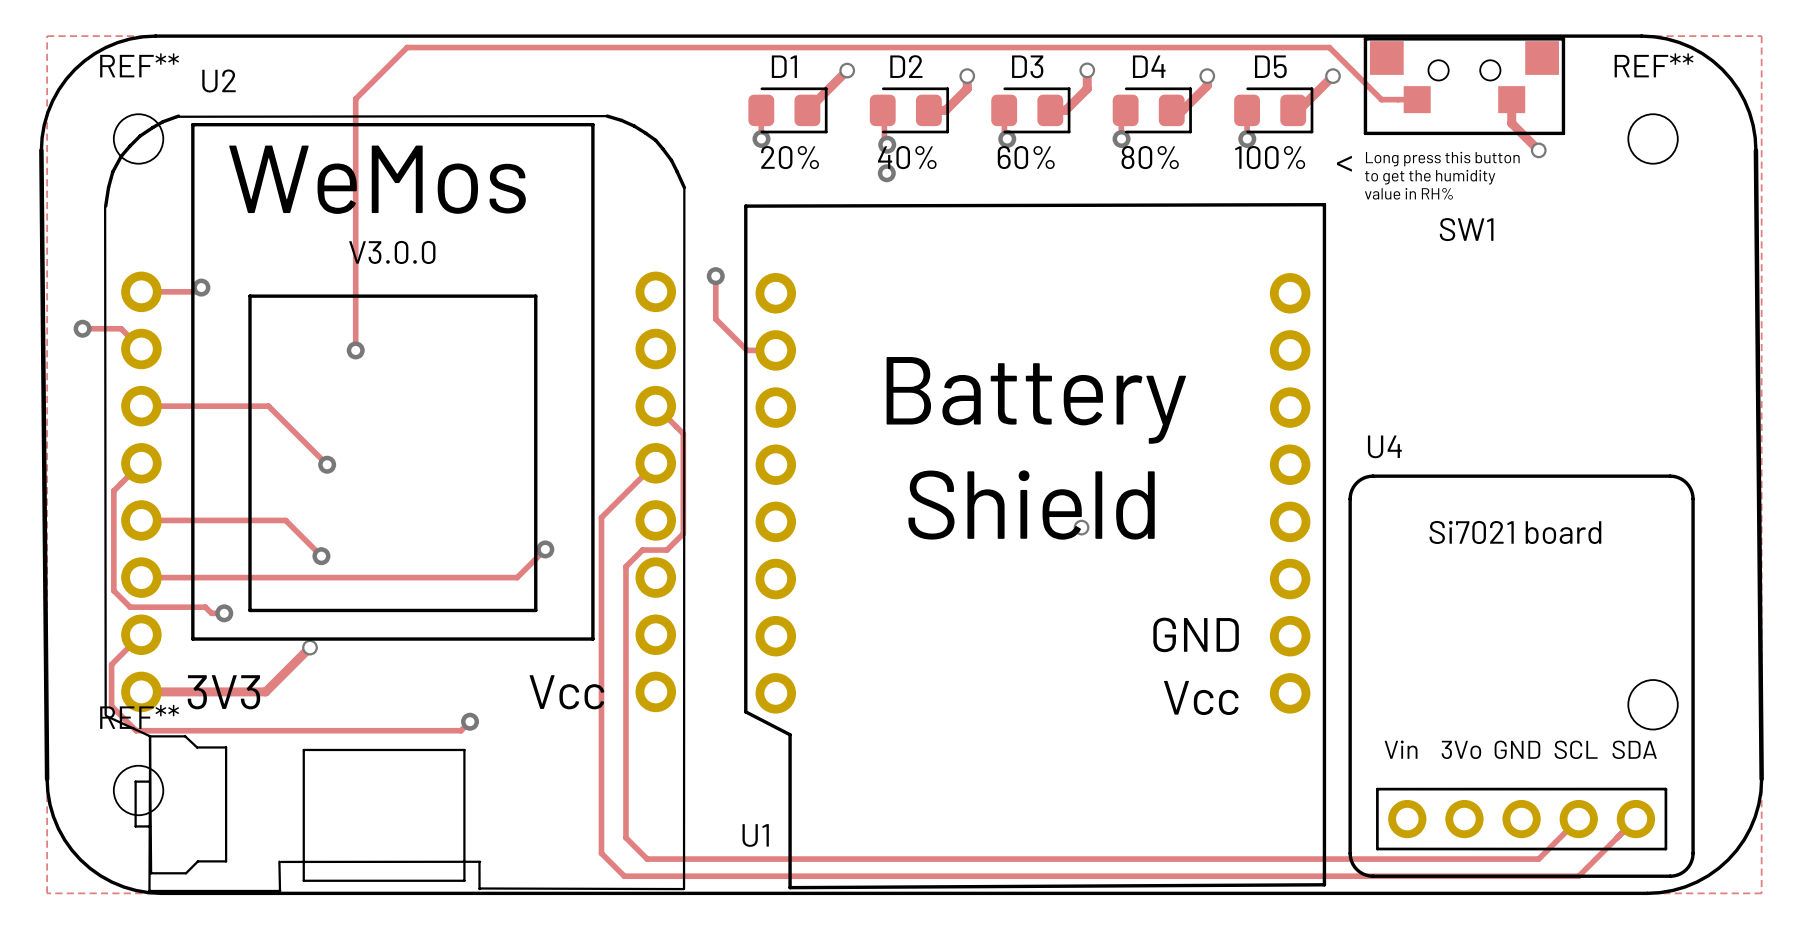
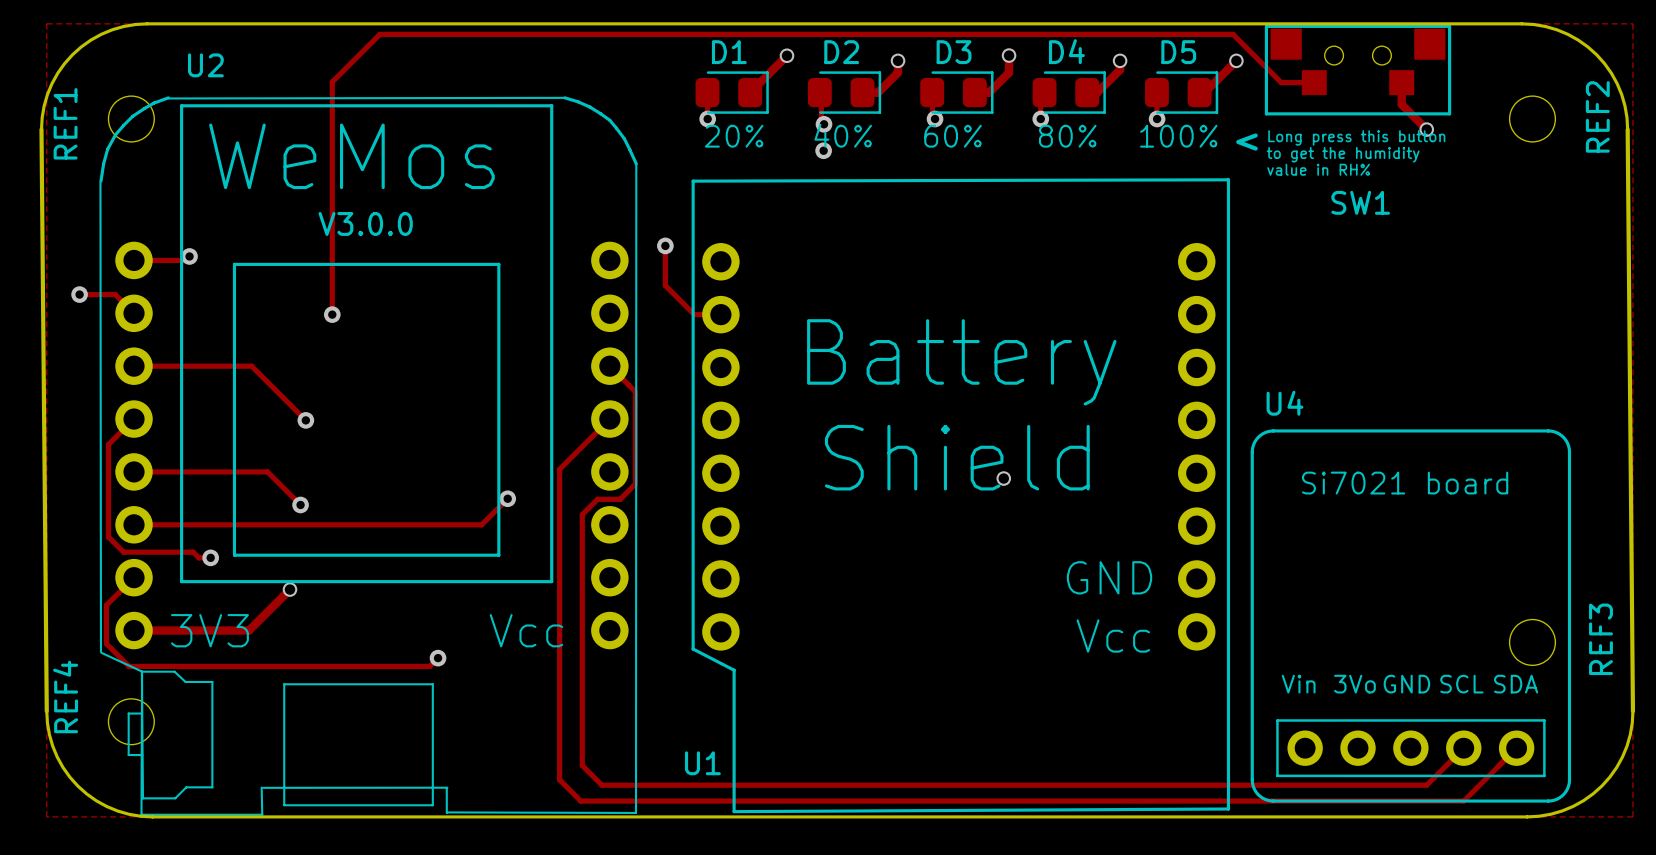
REF** name: REF** (139, 65) -> REF1 (65, 123)
REF** name: REF** (1654, 65) -> REF2 (1597, 116)
REF3 name: none -> REF3 (1600, 639)
REF** name: REF** (139, 716) -> REF4 (65, 696)

